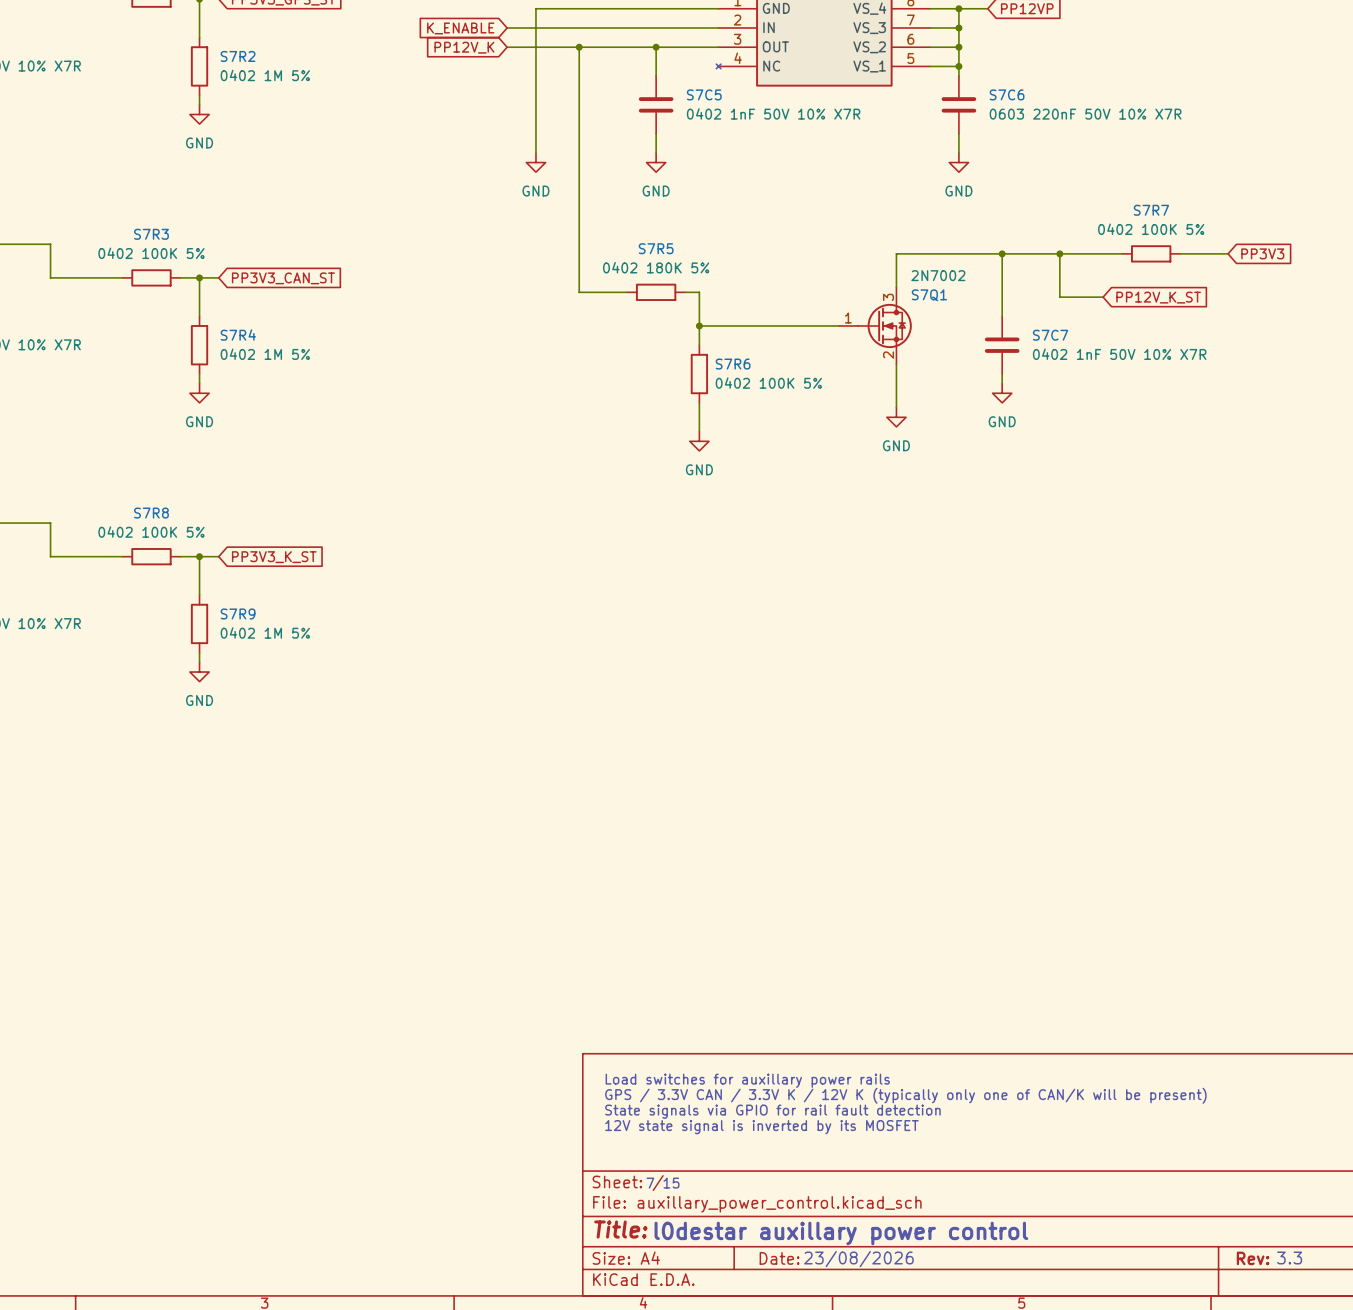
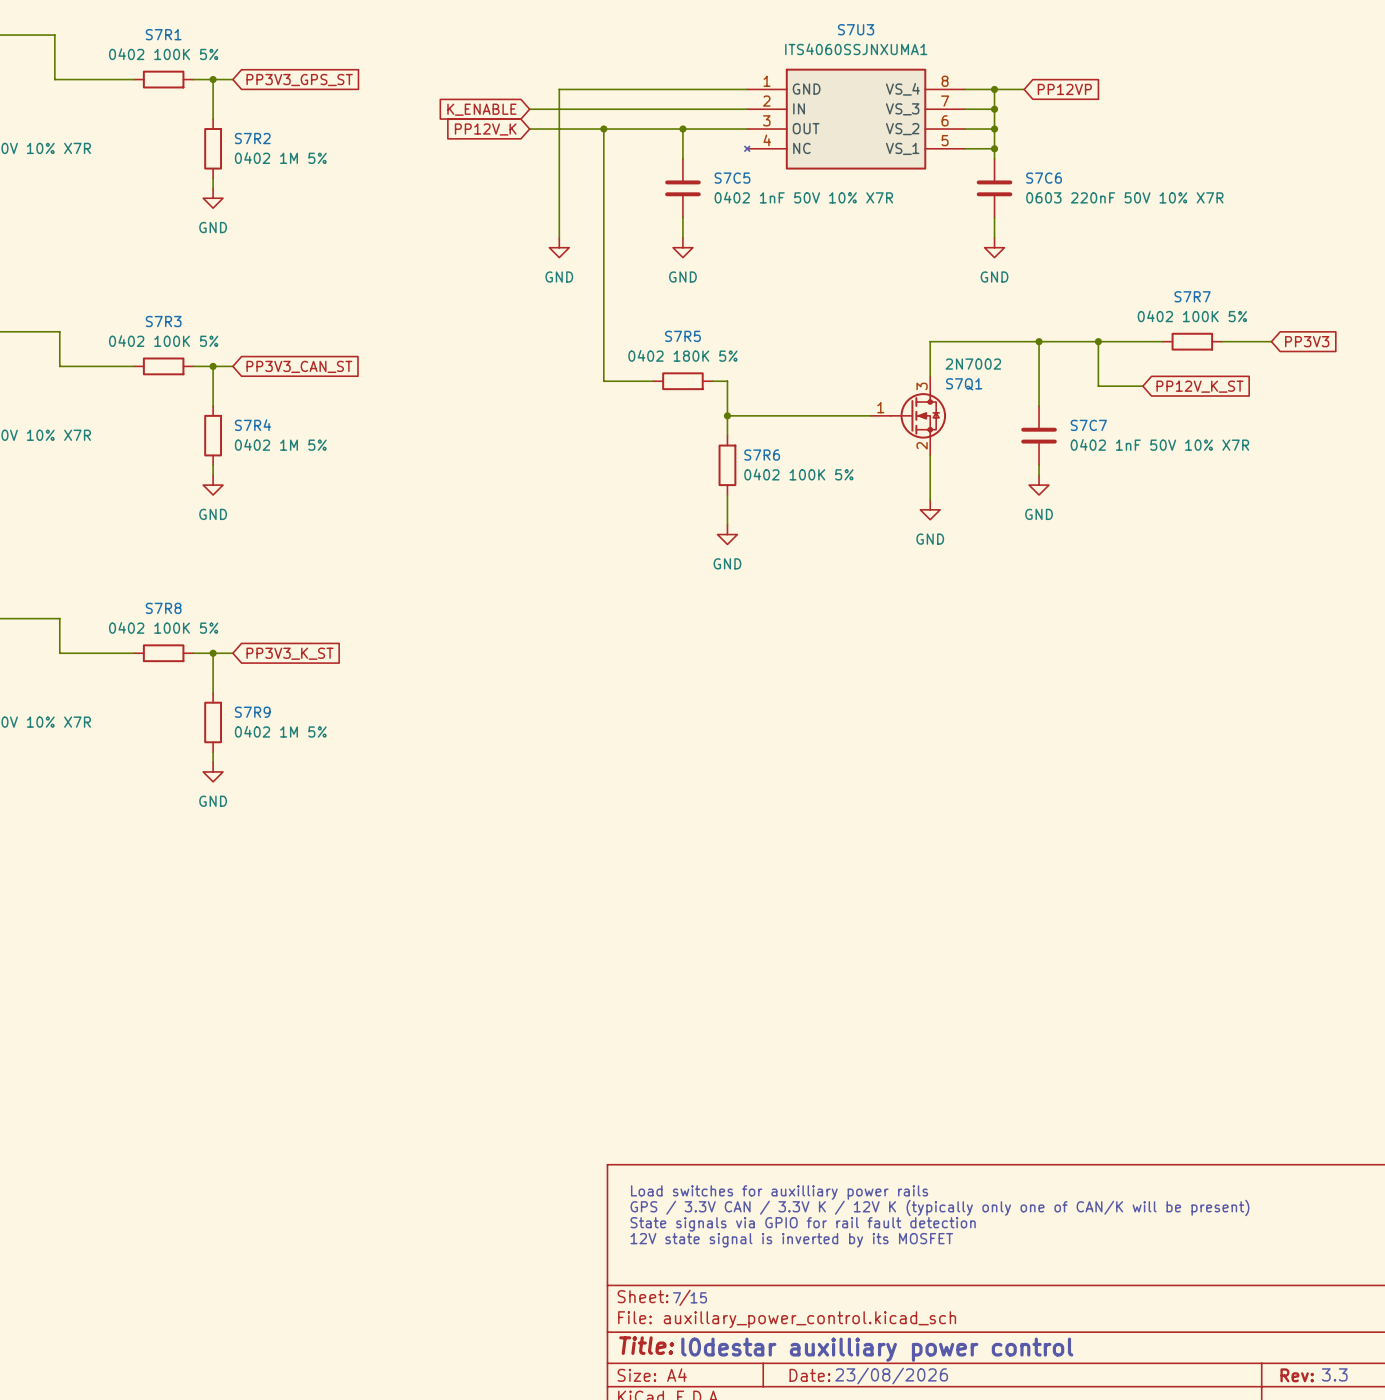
text: Load switches for auxillary power rails (747, 1080) -> Load switches for auxilliary power rails (779, 1192)
text: l0destar auxillary power control (841, 1233) -> l0destar auxilliary power control (877, 1349)

